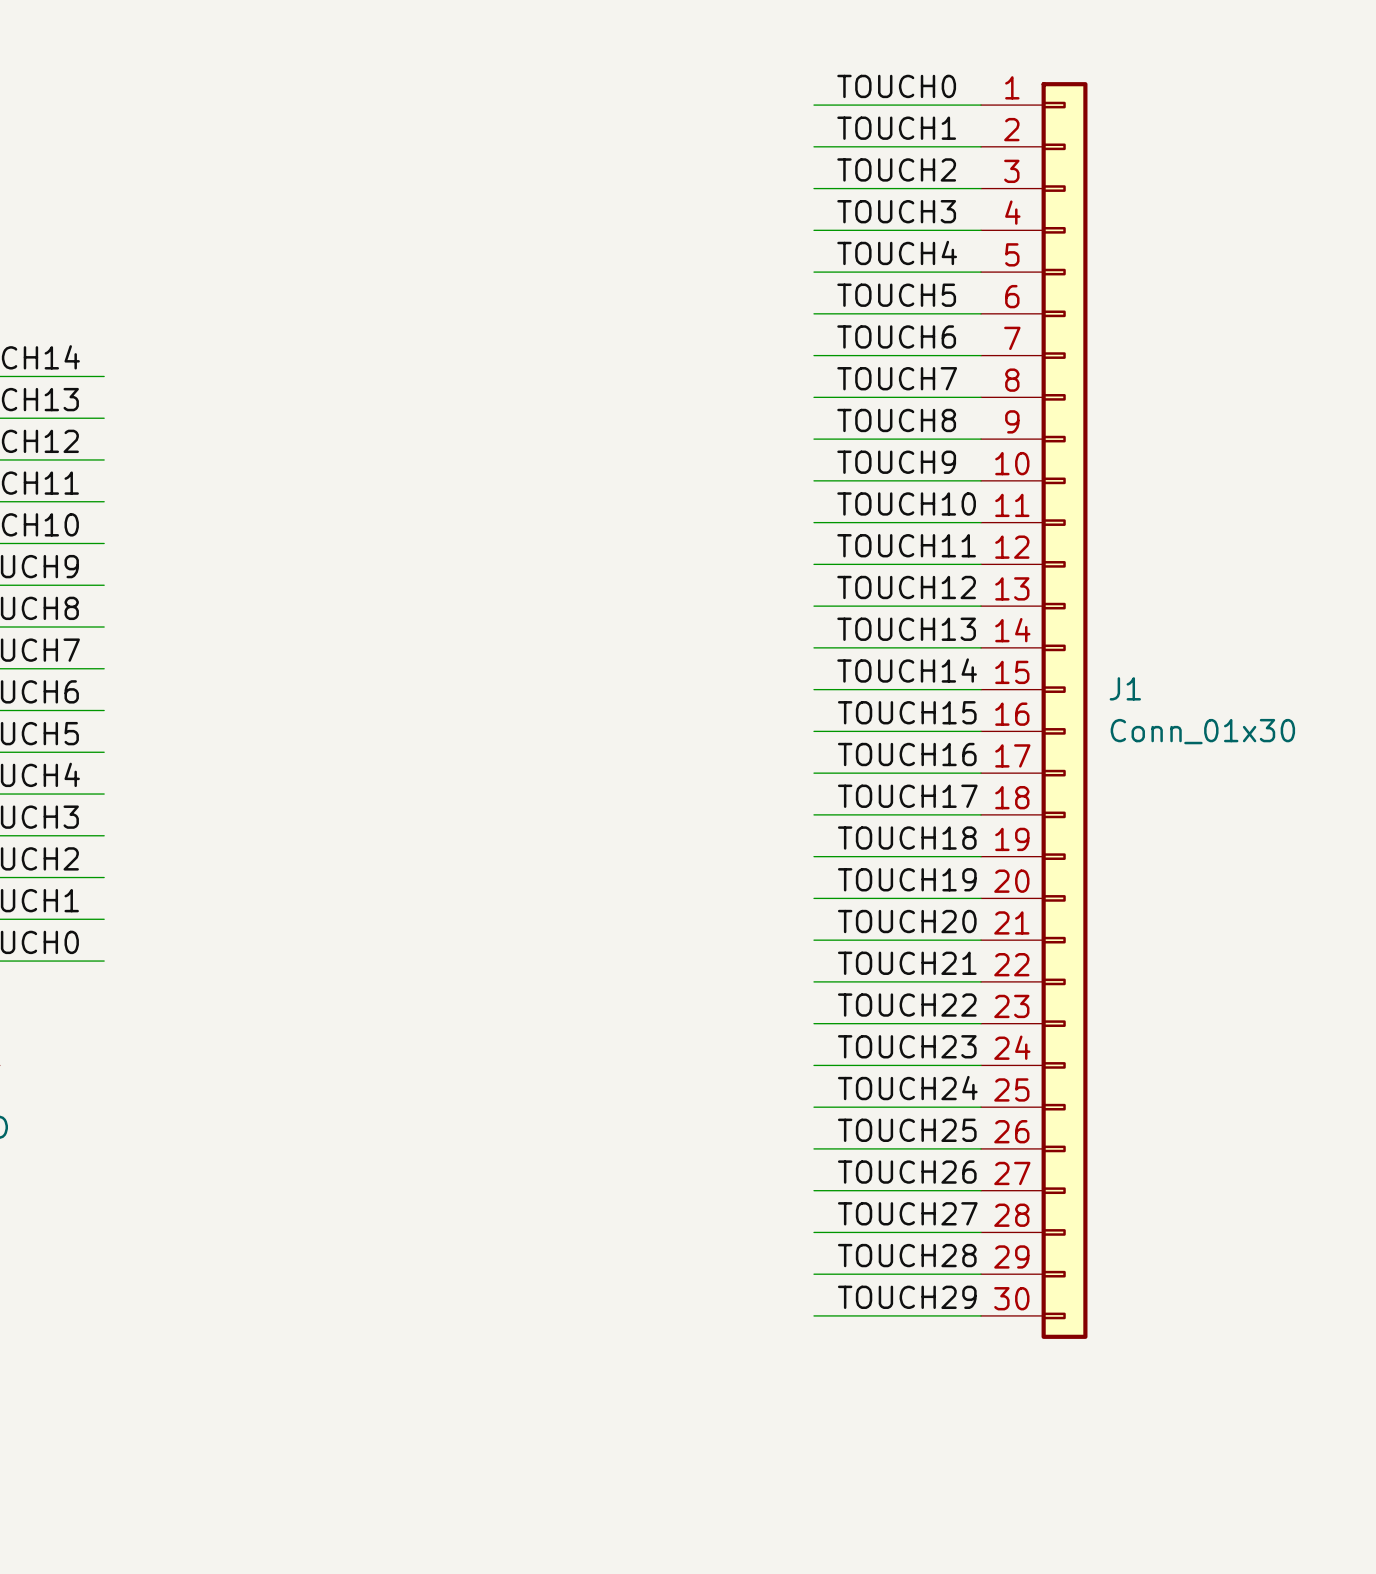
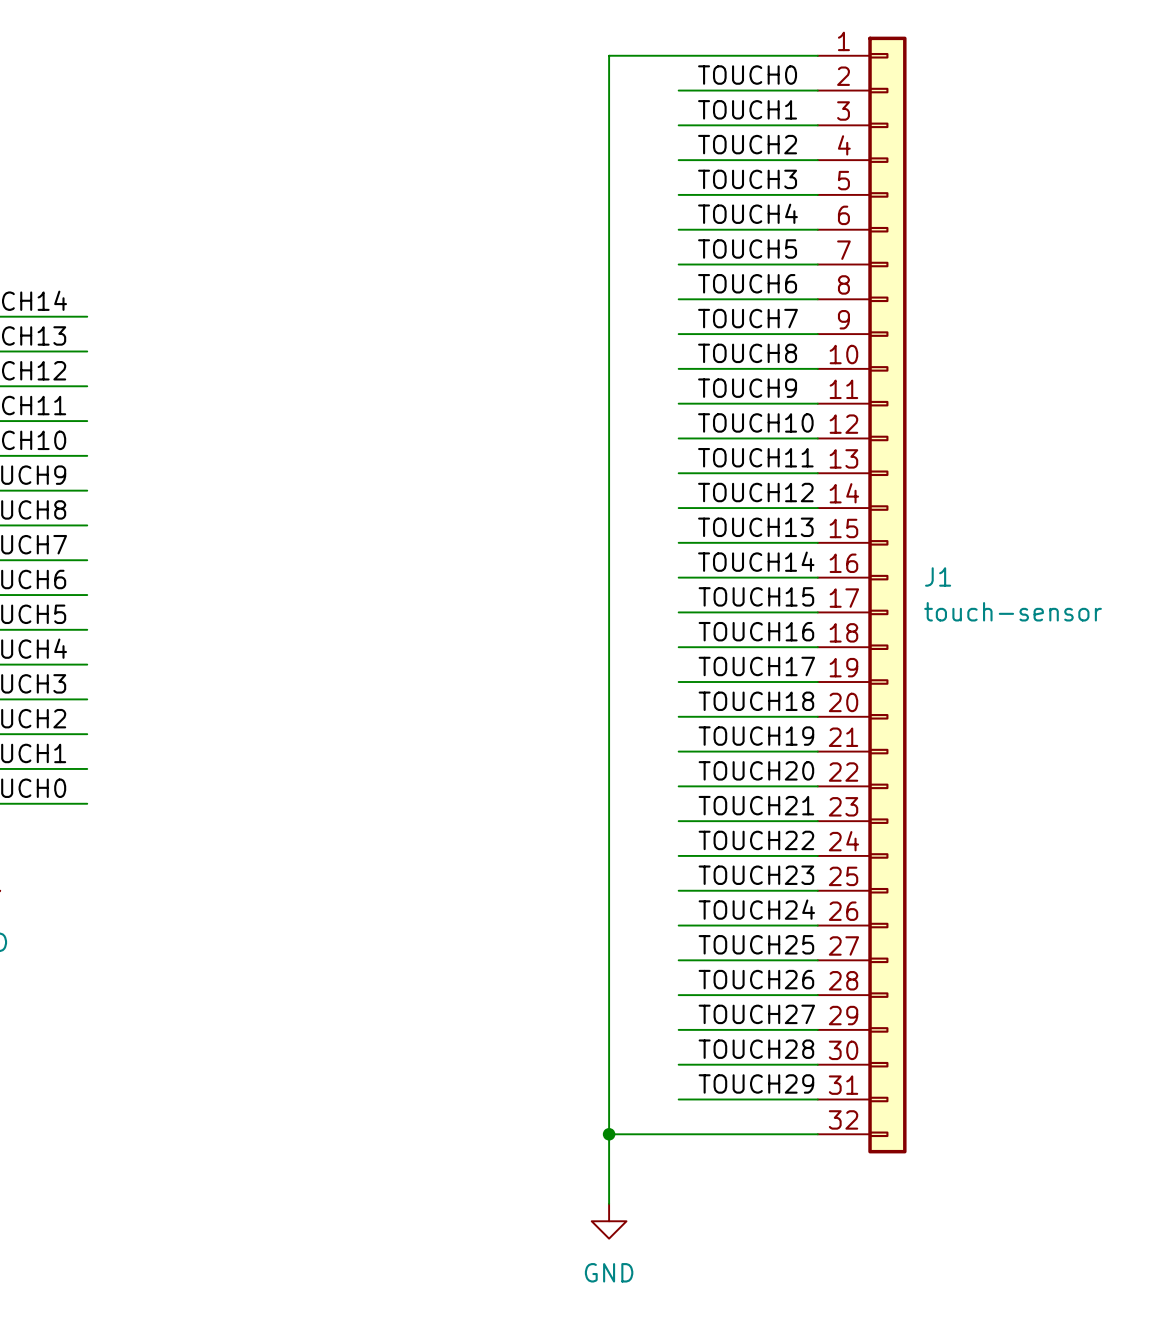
wire: none -> (817, 55) (609, 55) (609, 1203)
J1 symbol: [981, 82, 1088, 1339] -> [817, 36, 907, 1154]
J1 value: Conn_01x30 (1202, 731) -> touch-sensor (1013, 611)
wire: none -> (609, 1134) (817, 1134)
junction: none -> (609, 1134)
power symbol: none -> GND (609, 1221)

